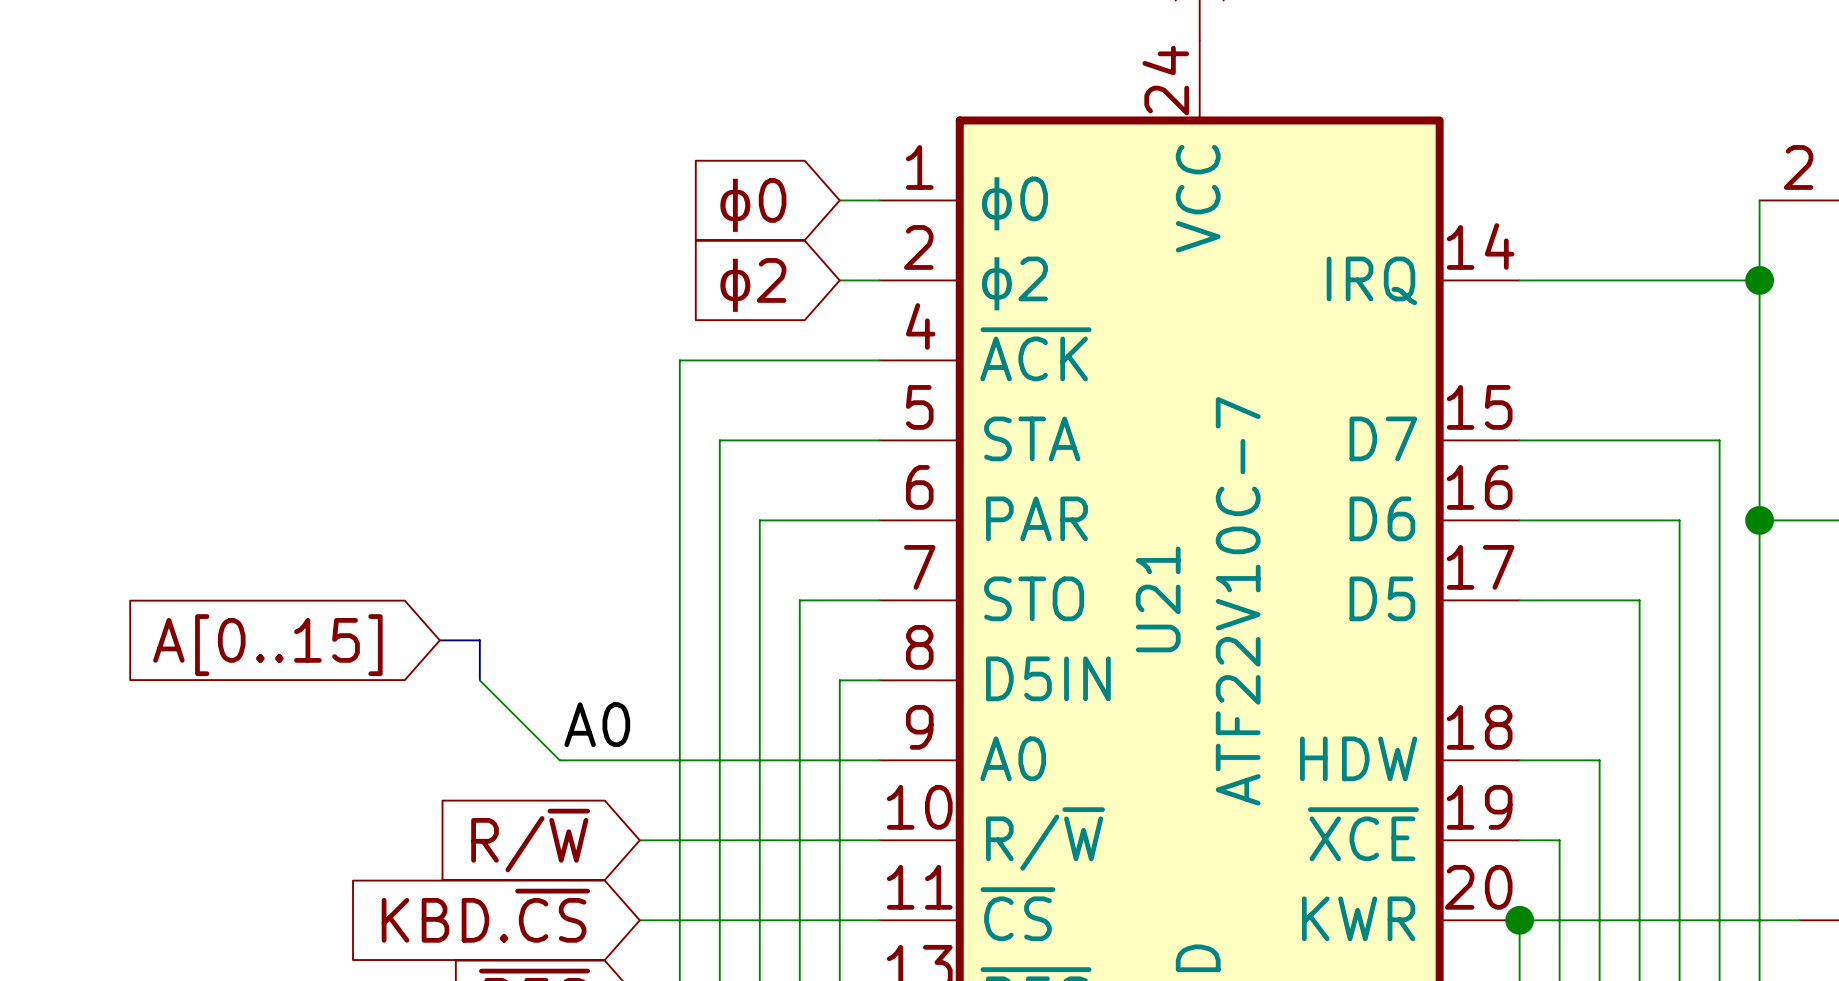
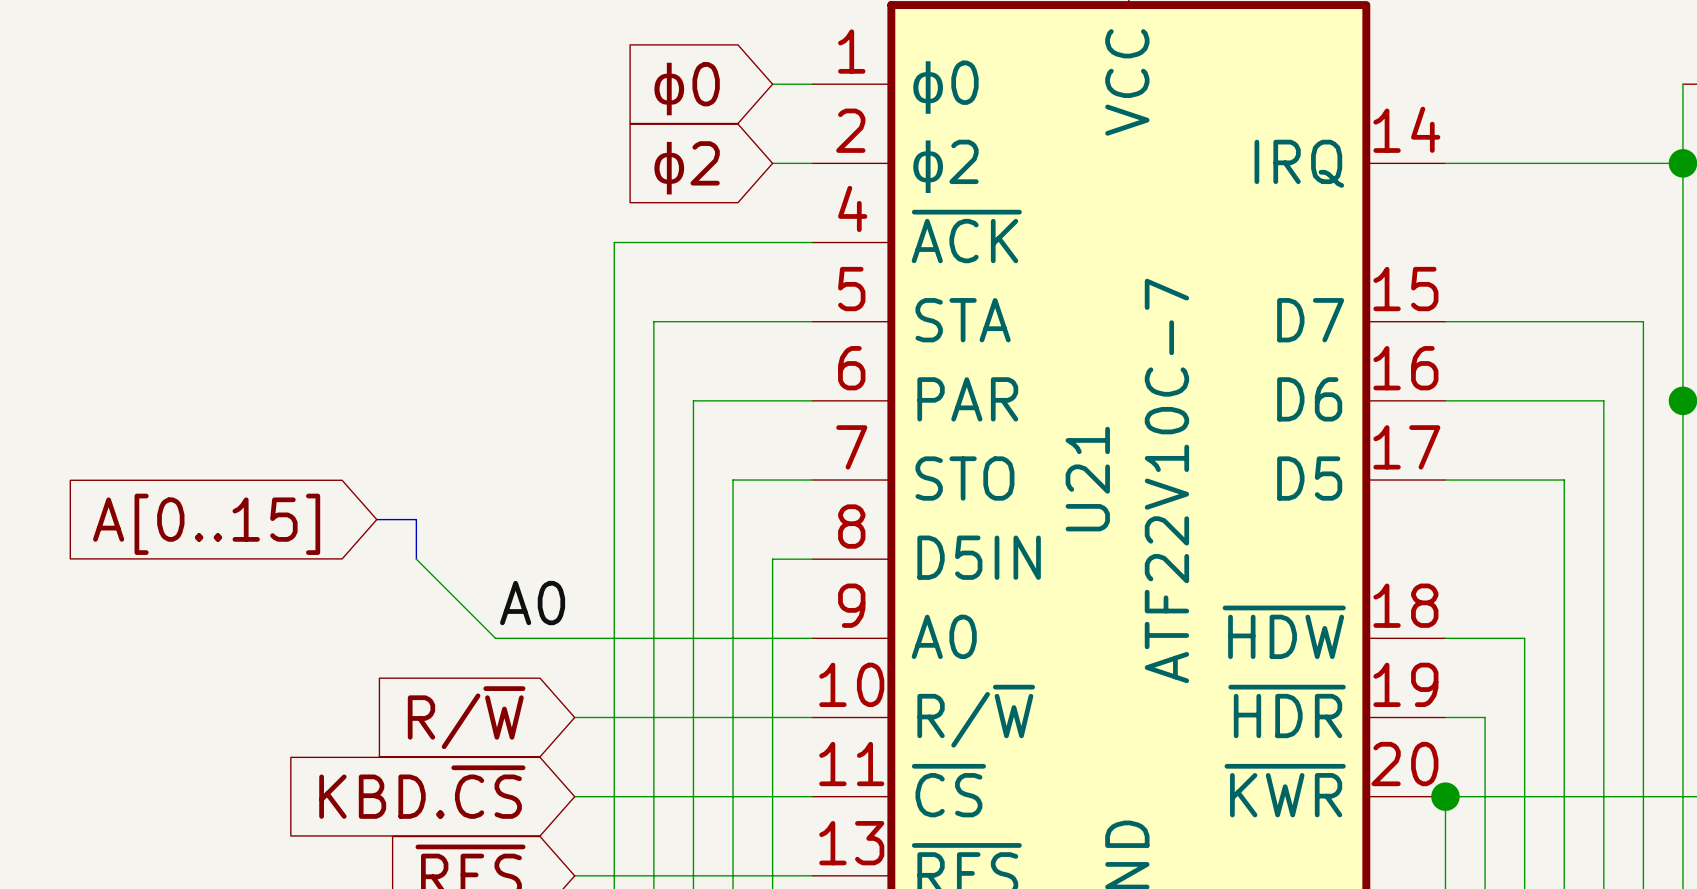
U21 pin name: HDW (1358, 758) -> ~{HDW} (1284, 632)
U21 pin name: ~{XCE} (1363, 834) -> ~{HDR} (1287, 711)
U21 pin name: KWR (1358, 918) -> ~{KWR} (1285, 790)

